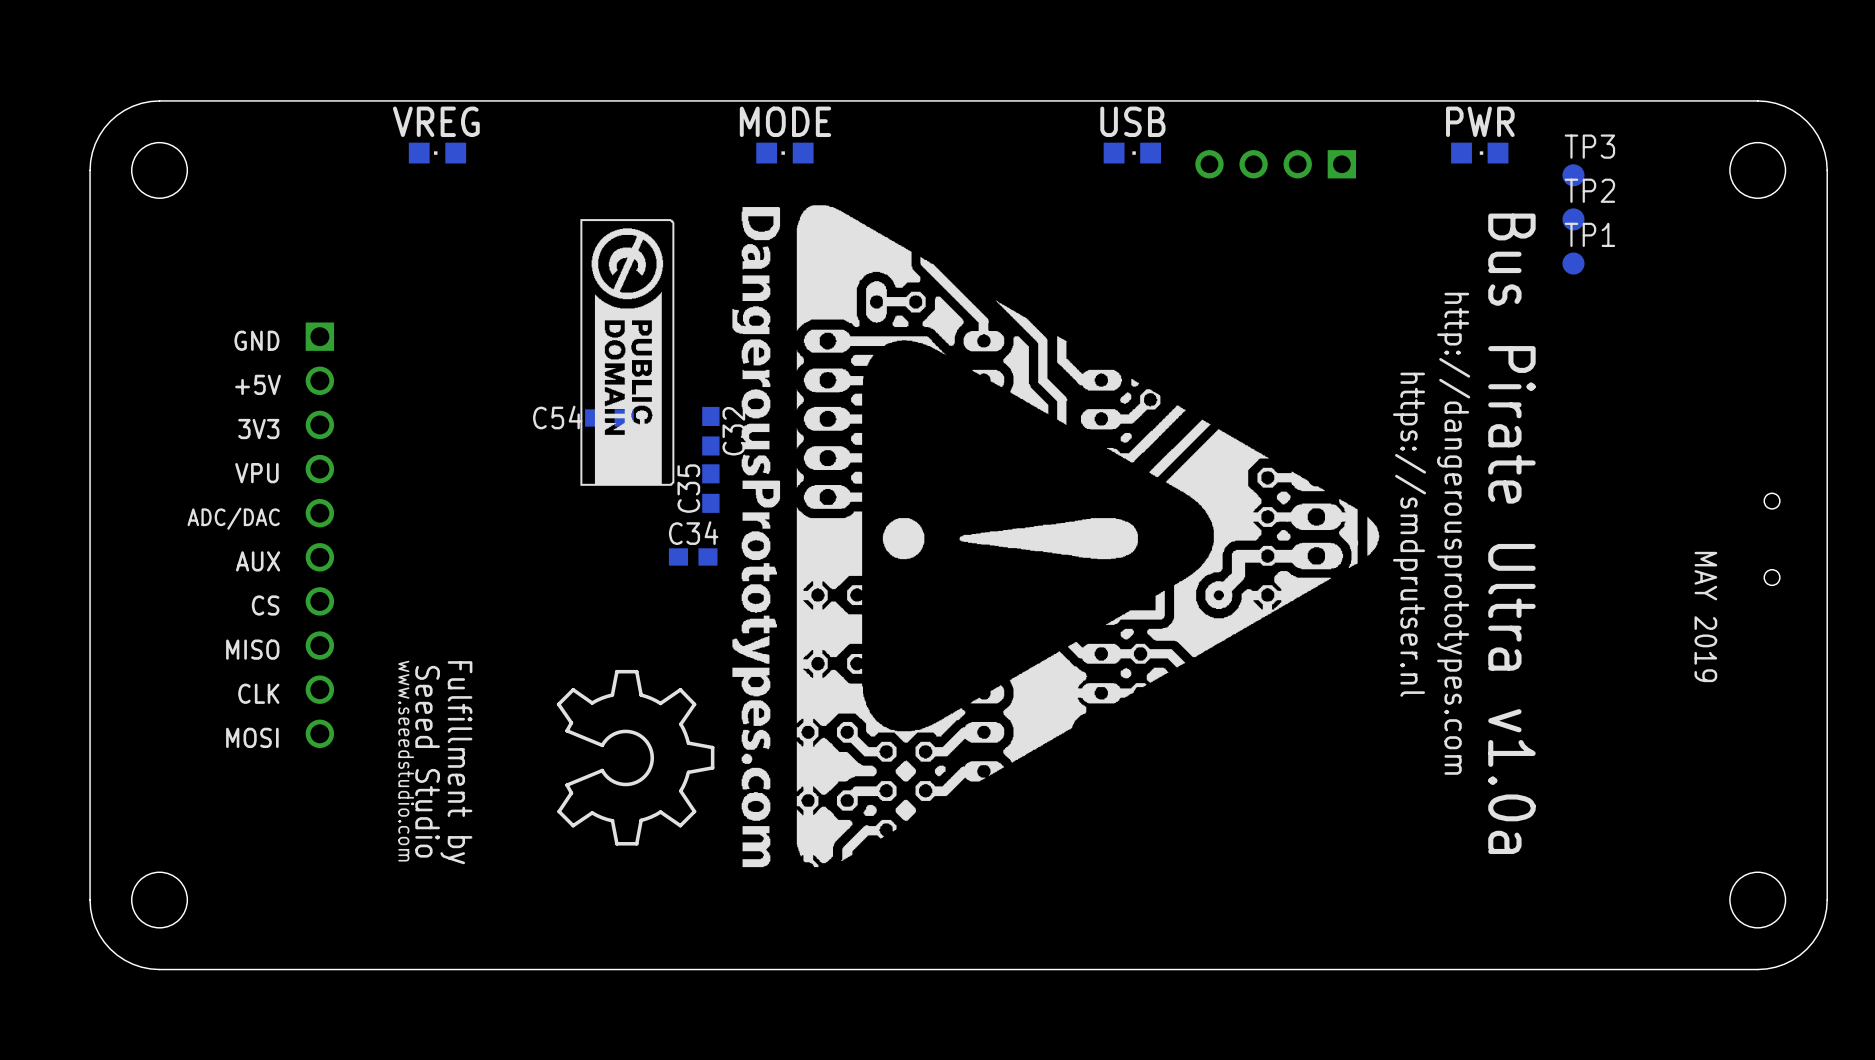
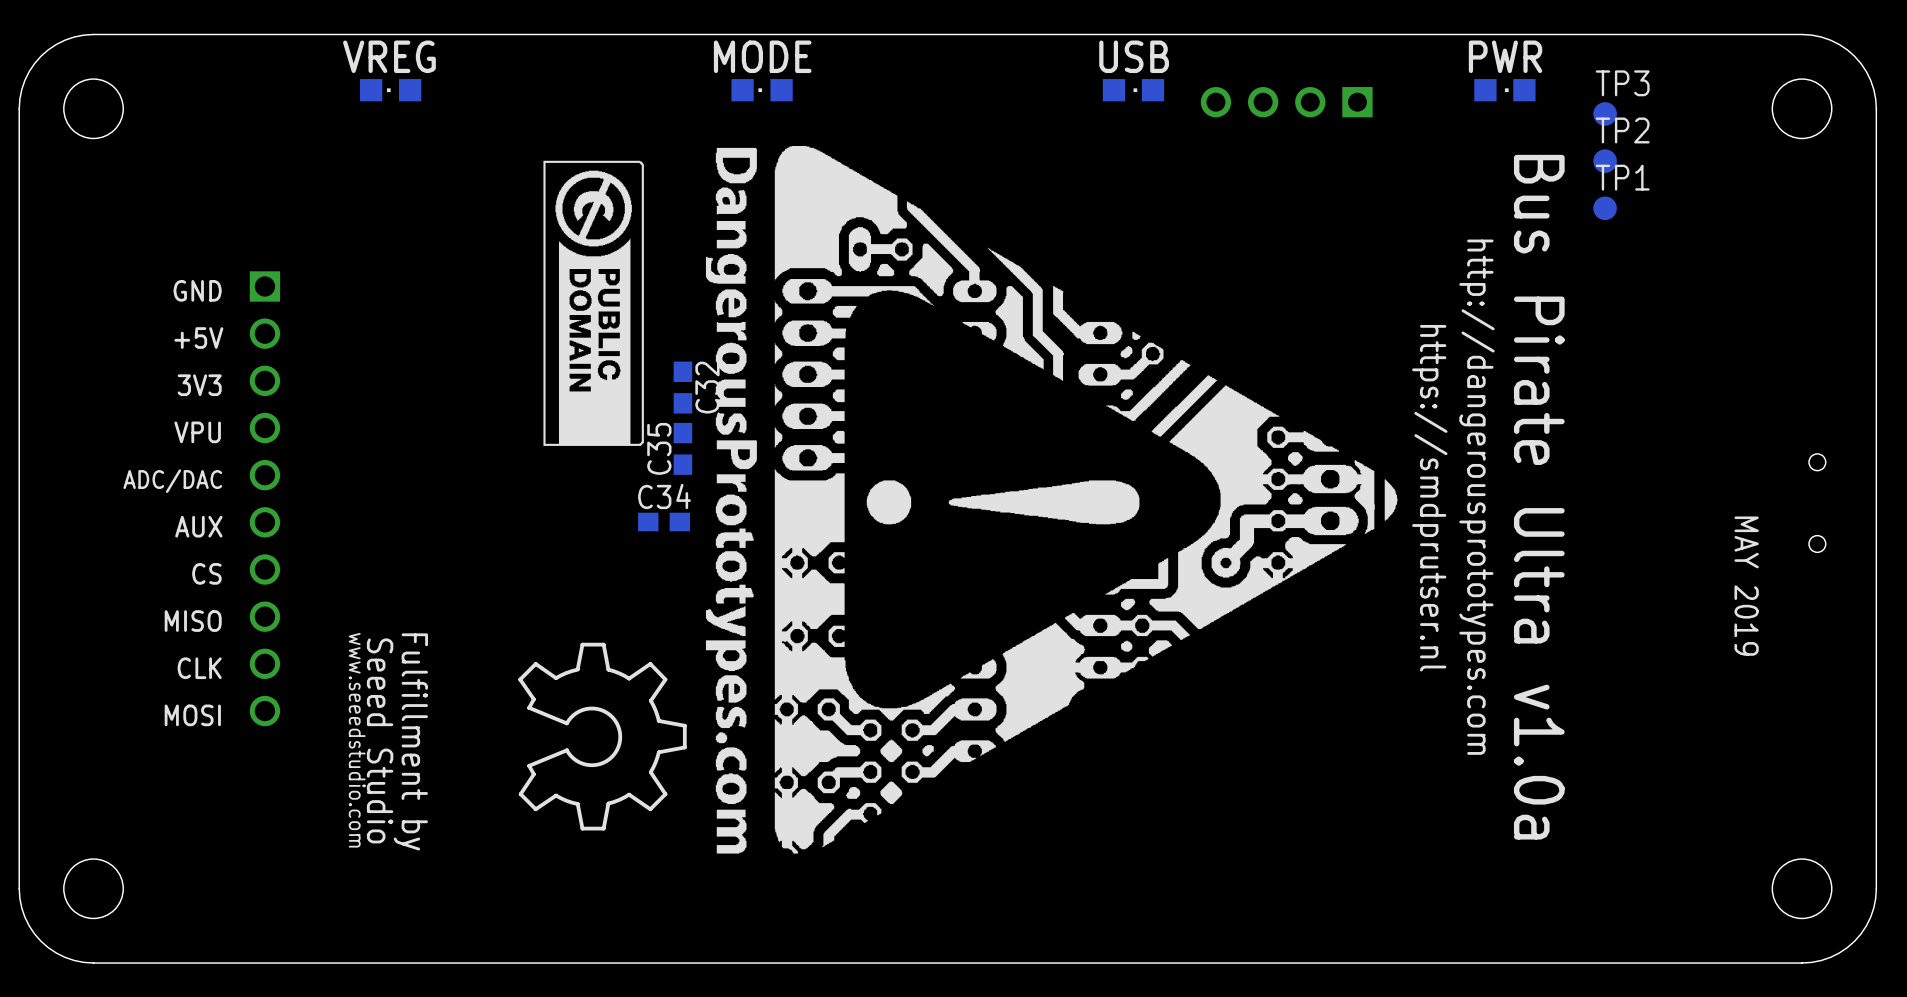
C54: (609, 417) -> none

